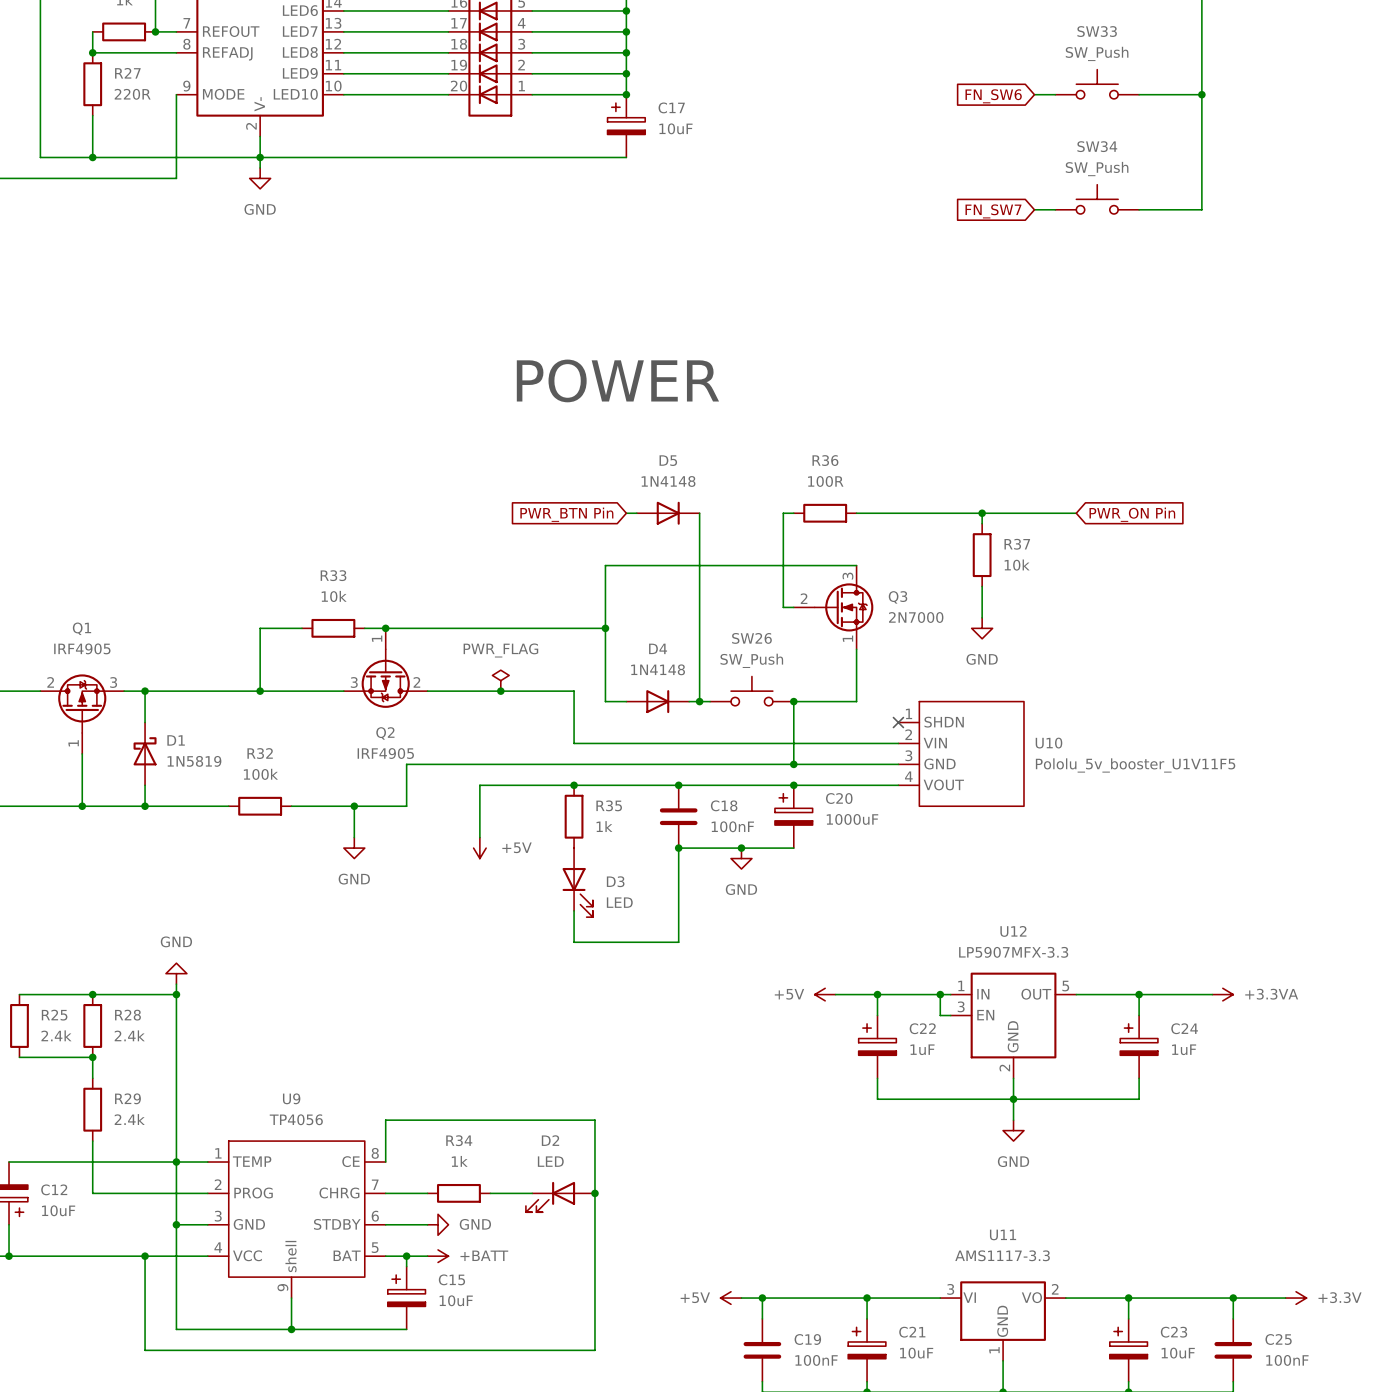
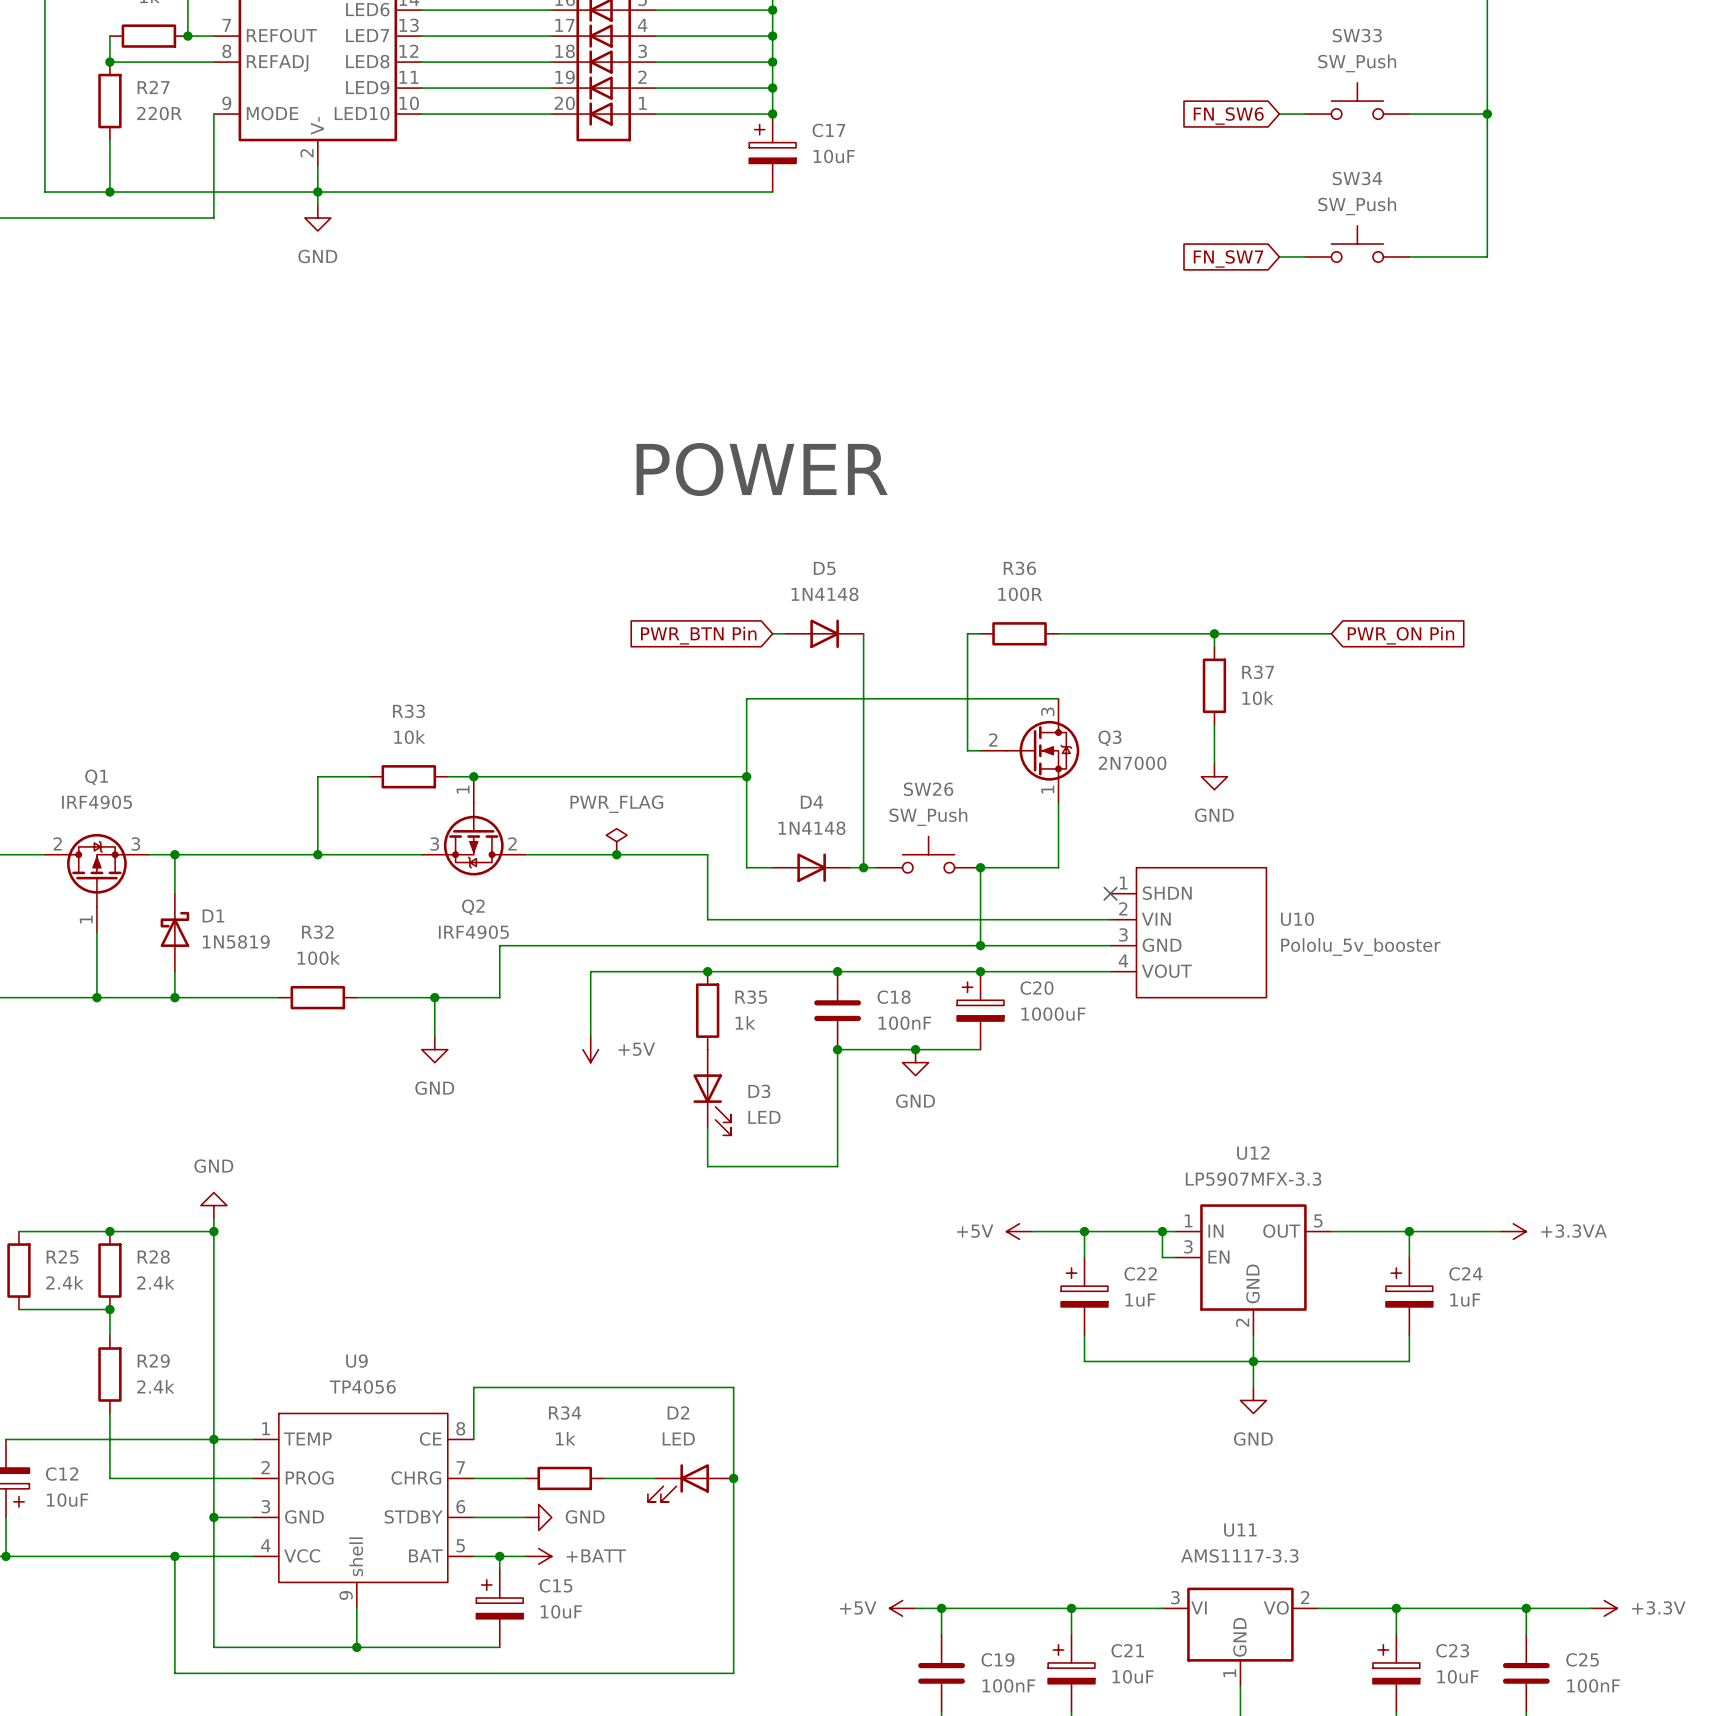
U10 value: Pololu_5v_booster_U1V11F5 (1135, 765) -> Pololu_5v_booster (1360, 947)

